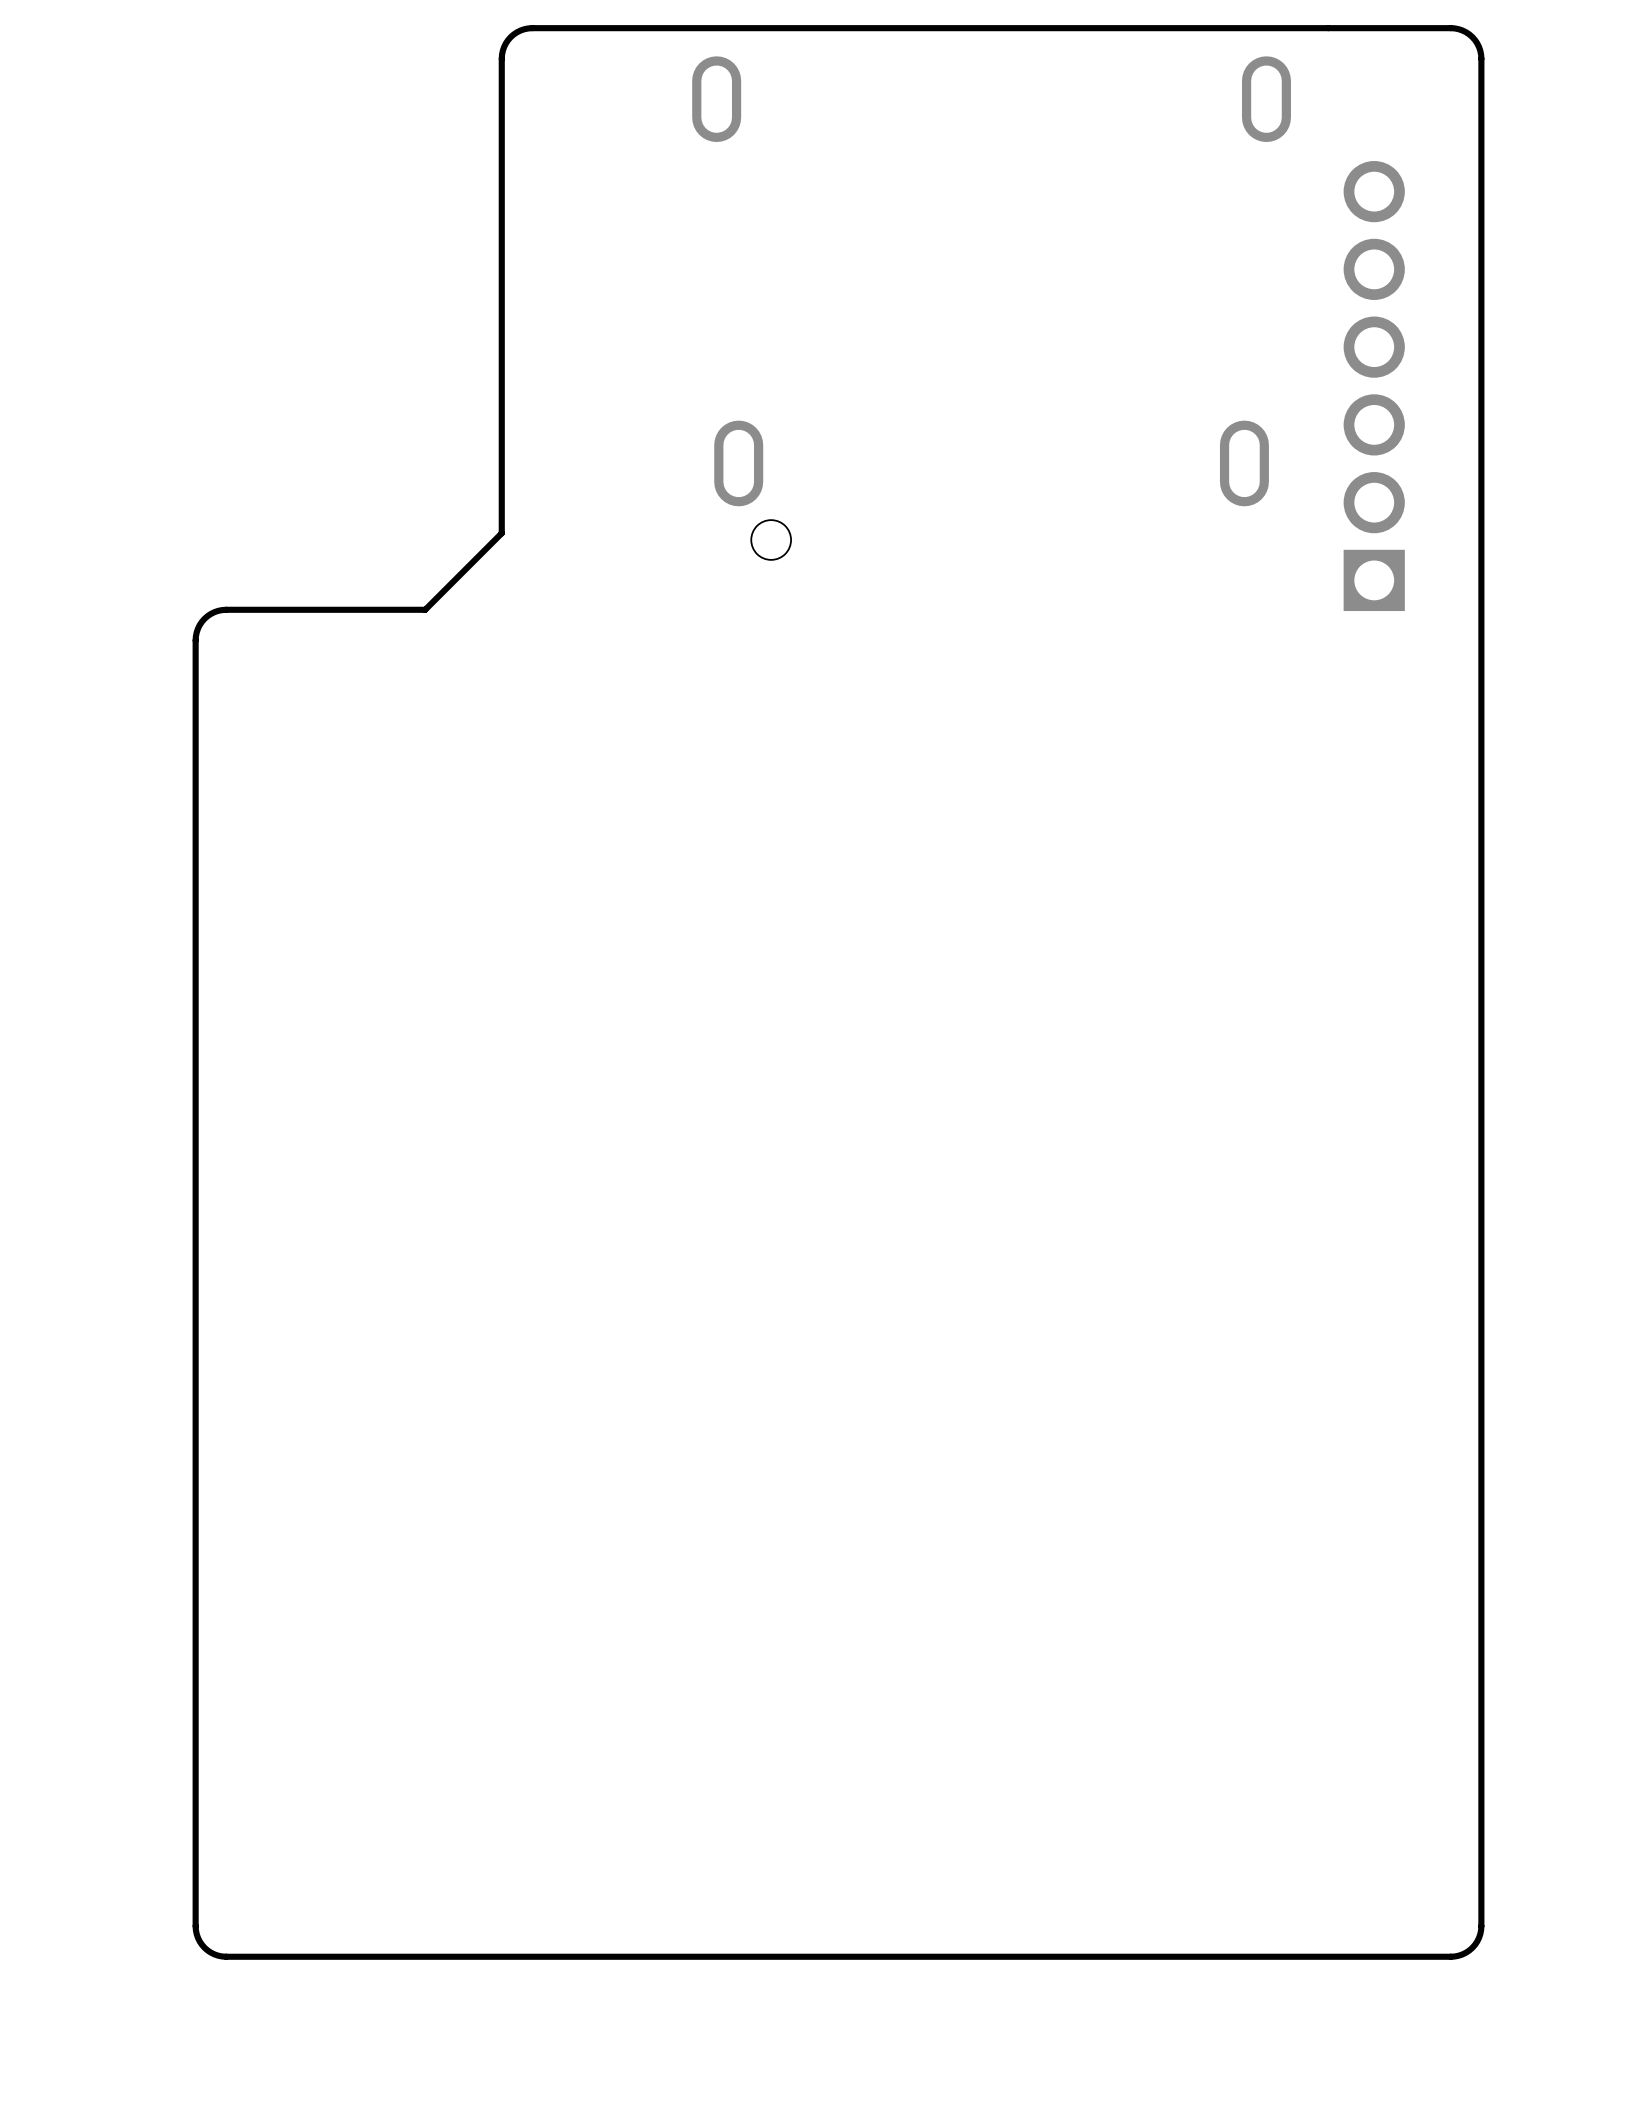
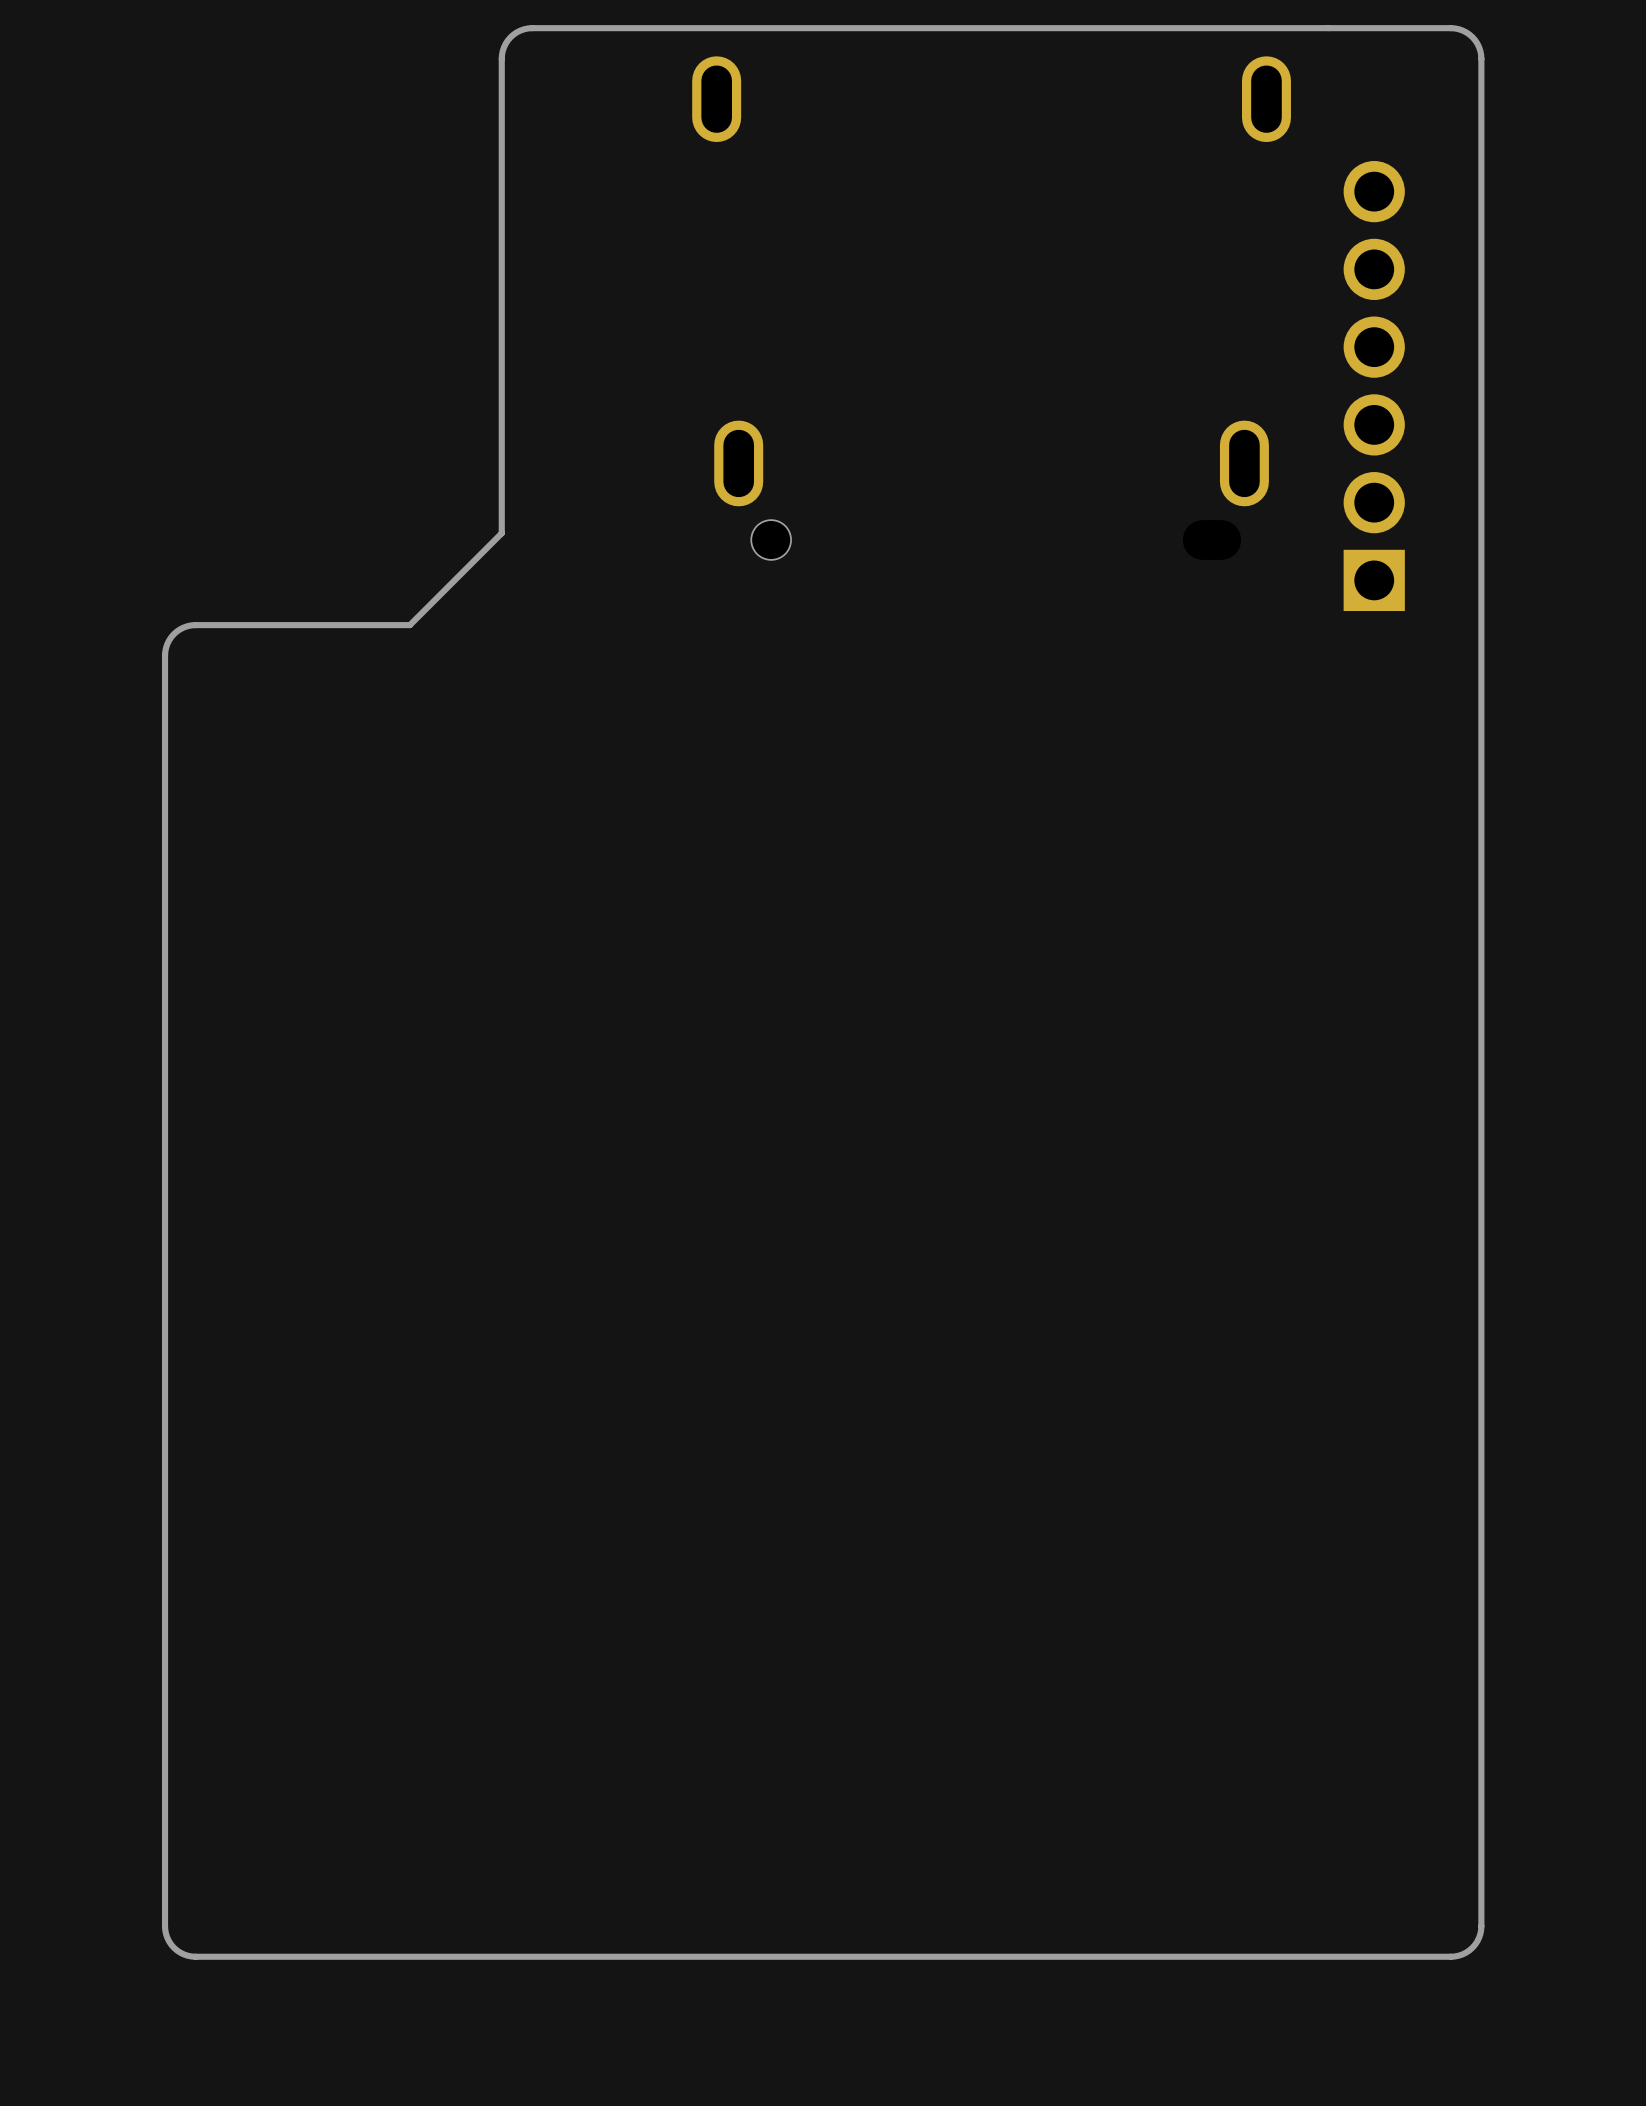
board edge: (425, 609) (222, 610) (214, 612) (204, 618) (199, 625) (195, 636) (195, 1926) (197, 1937) (204, 1947) (214, 1954) (226, 1956) -> (425, 609) (409, 625) (191, 625) (180, 629) (174, 634) (169, 640) (165, 651) (165, 1926) (169, 1941) (180, 1952) (191, 1956) (226, 1956)

